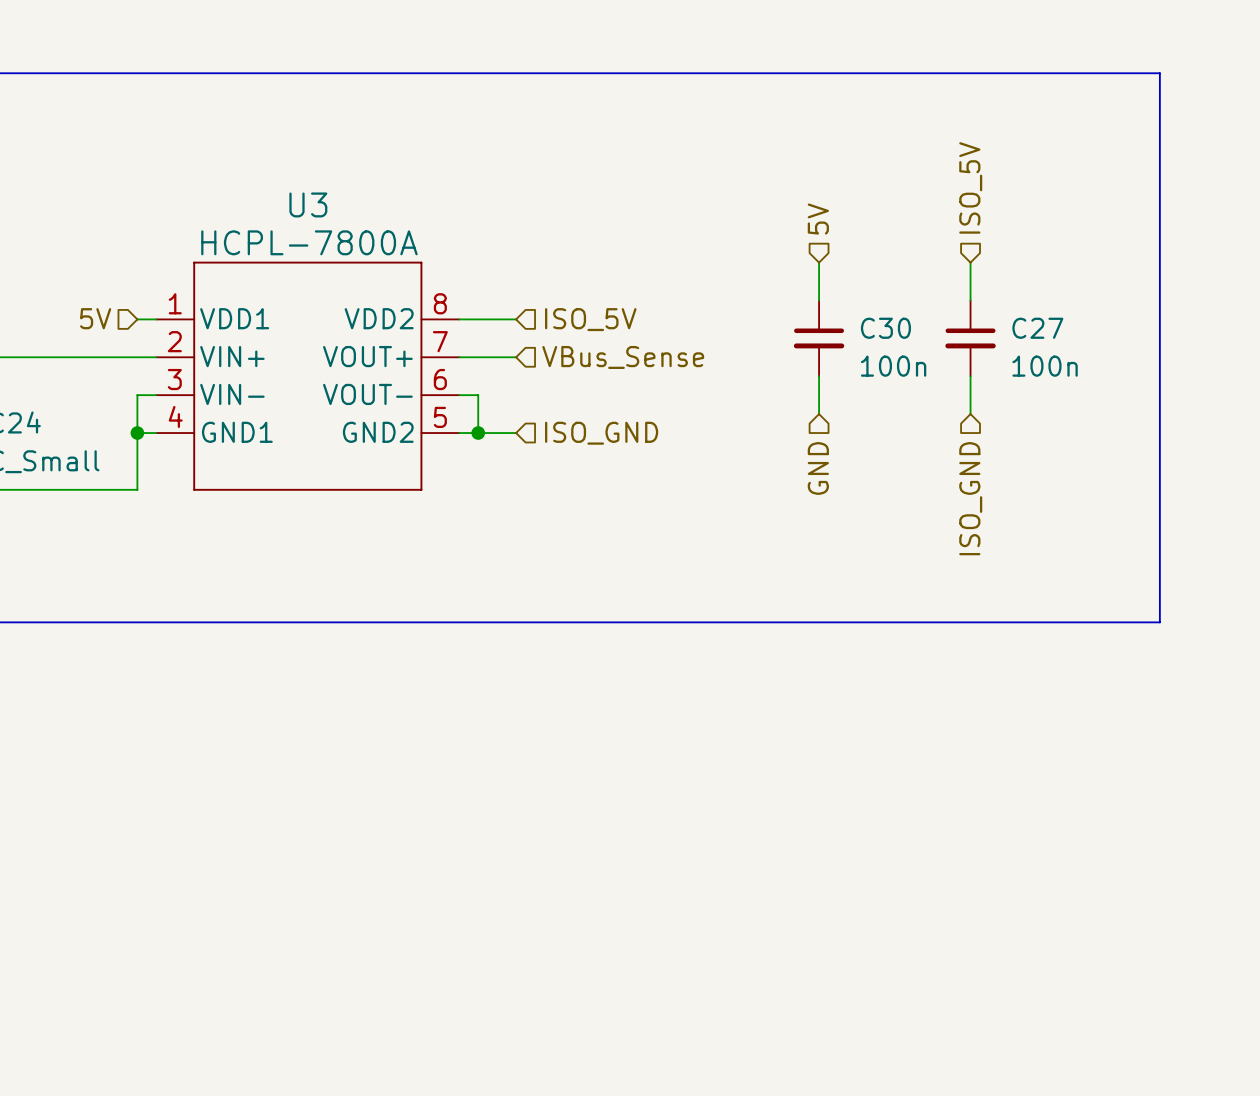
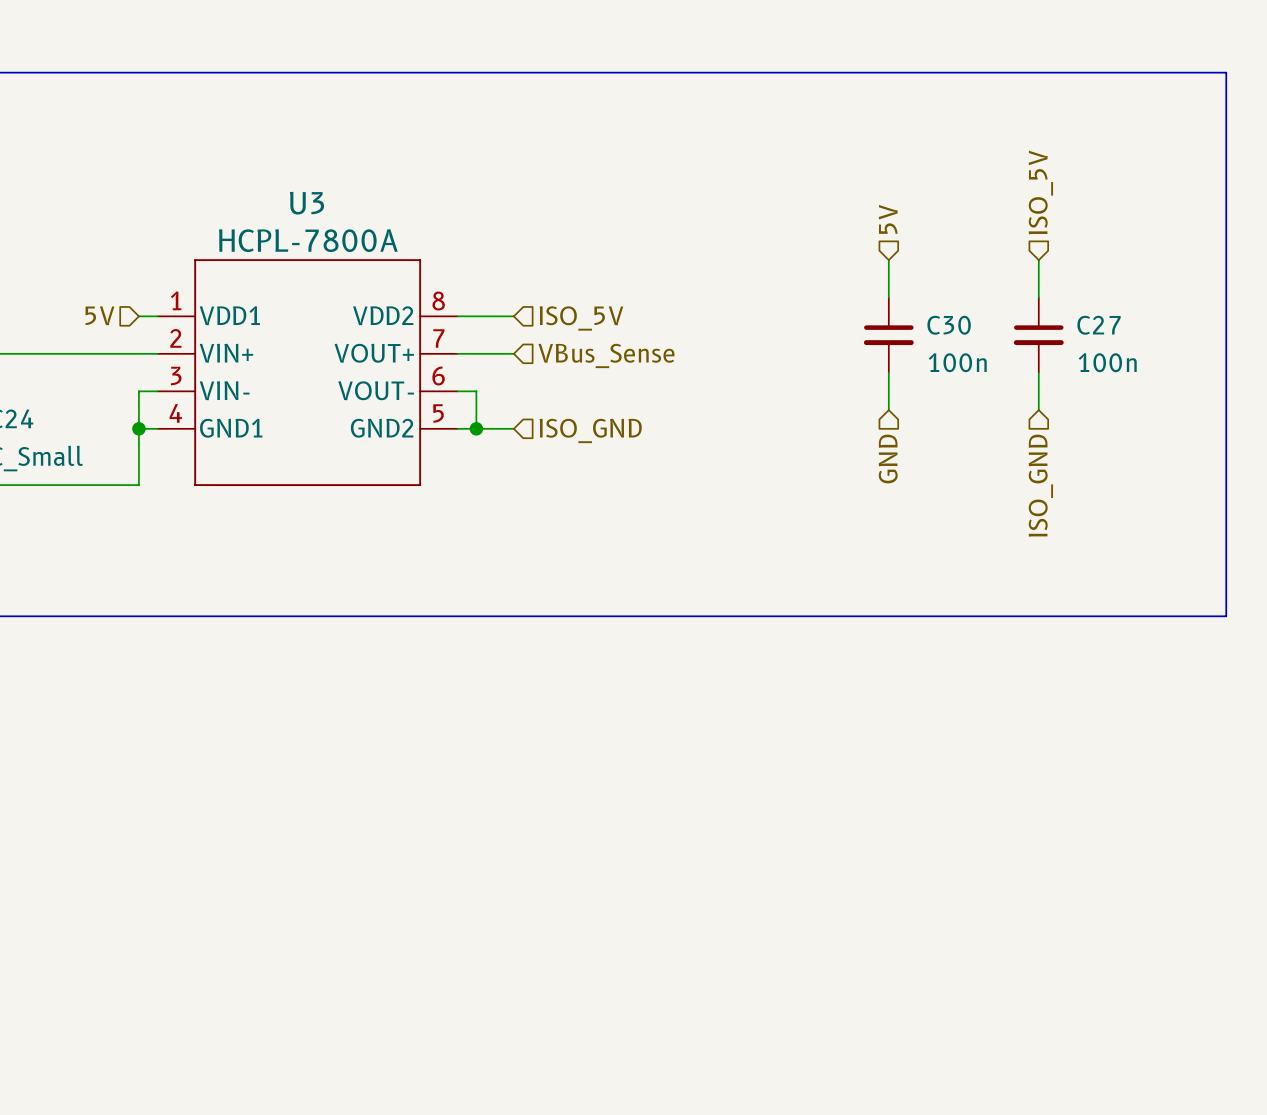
line: (1159, 73) (1159, 622) -> (1151, 72) (1226, 72) (1226, 616) (1151, 616)
hierarchical label position: ISO_5V (970, 187) -> ISO_5V (1040, 192)
hierarchical label position: 5V (818, 219) -> 5V (888, 219)
wire: (819, 262) (819, 300) -> (1038, 260) (1038, 297)
wire: (970, 262) (970, 300) -> (888, 260) (888, 297)
C30 position: (819, 338) -> (888, 335)
C27 position: (970, 338) -> (1038, 335)
wire: (819, 376) (819, 414) -> (1038, 372) (1038, 410)
wire: (970, 376) (970, 414) -> (888, 372) (888, 410)
hierarchical label position: GND (818, 468) -> GND (888, 459)
hierarchical label position: ISO_GND (970, 498) -> ISO_GND (1040, 485)

